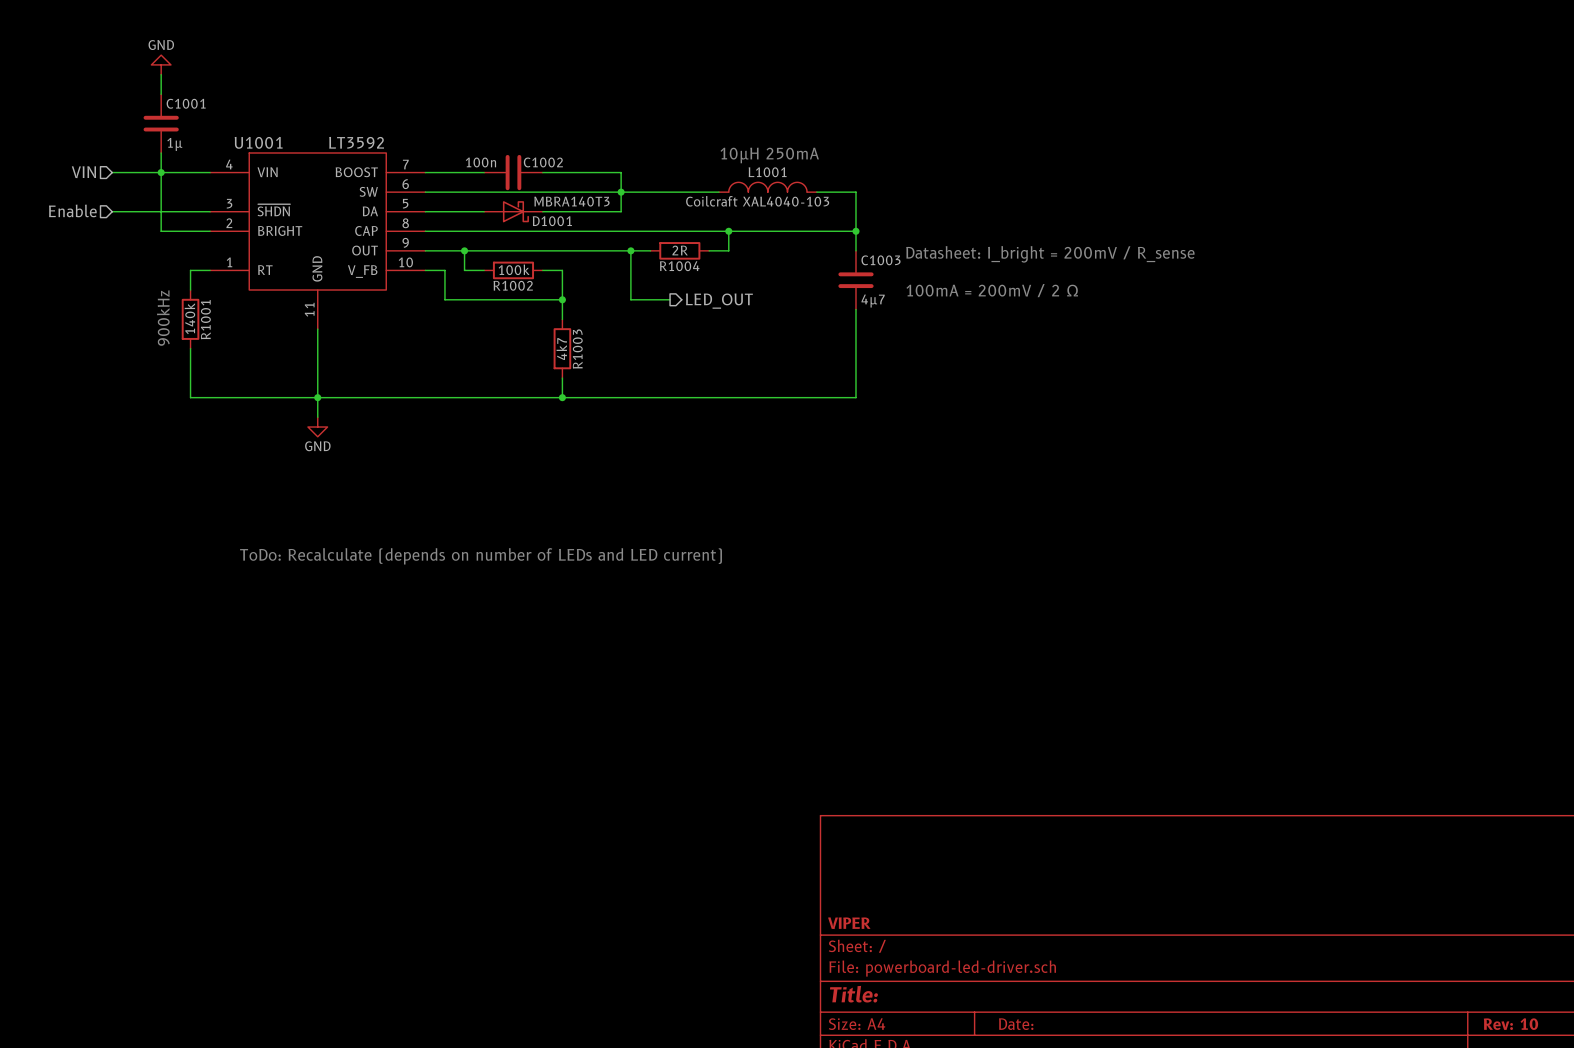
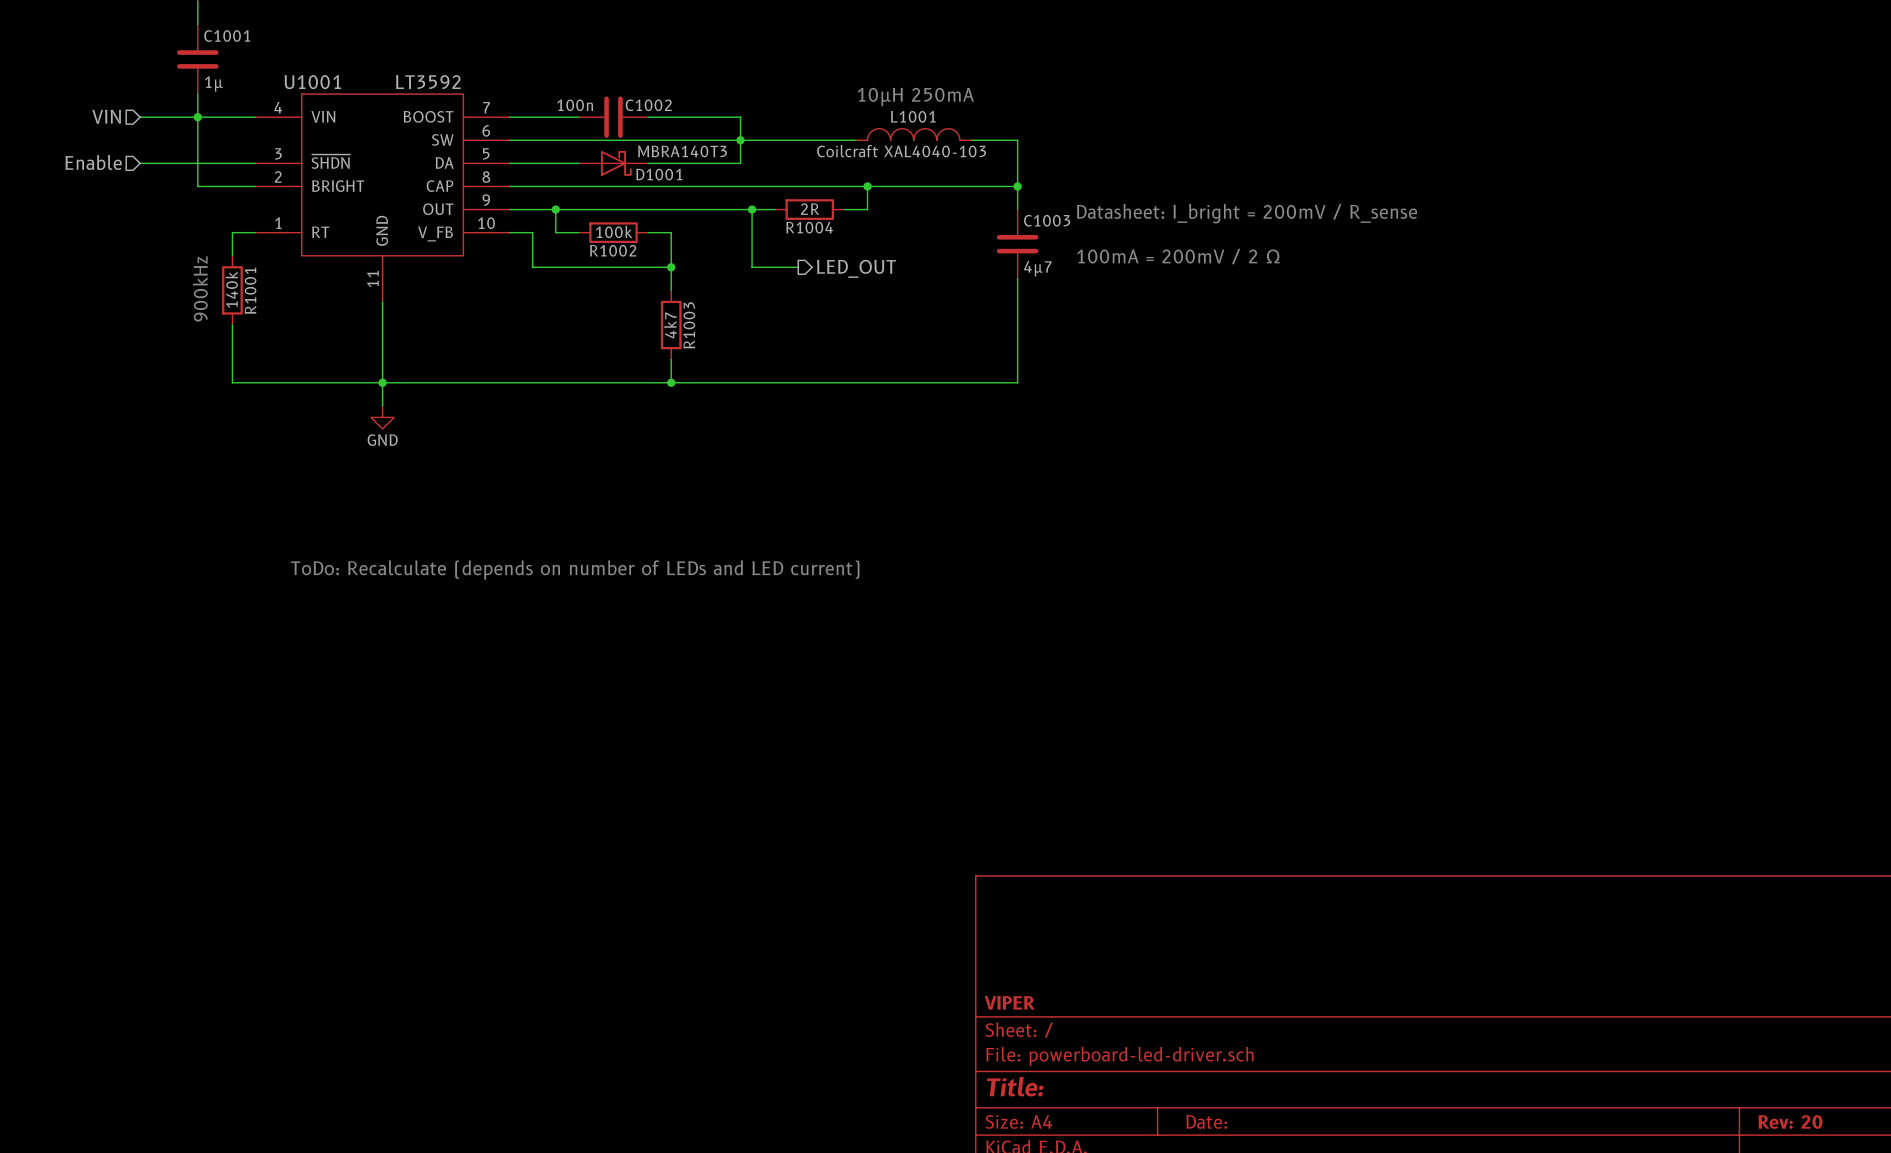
title block: Rev: 10 (1510, 1024) -> Rev: 20 (1790, 1122)

